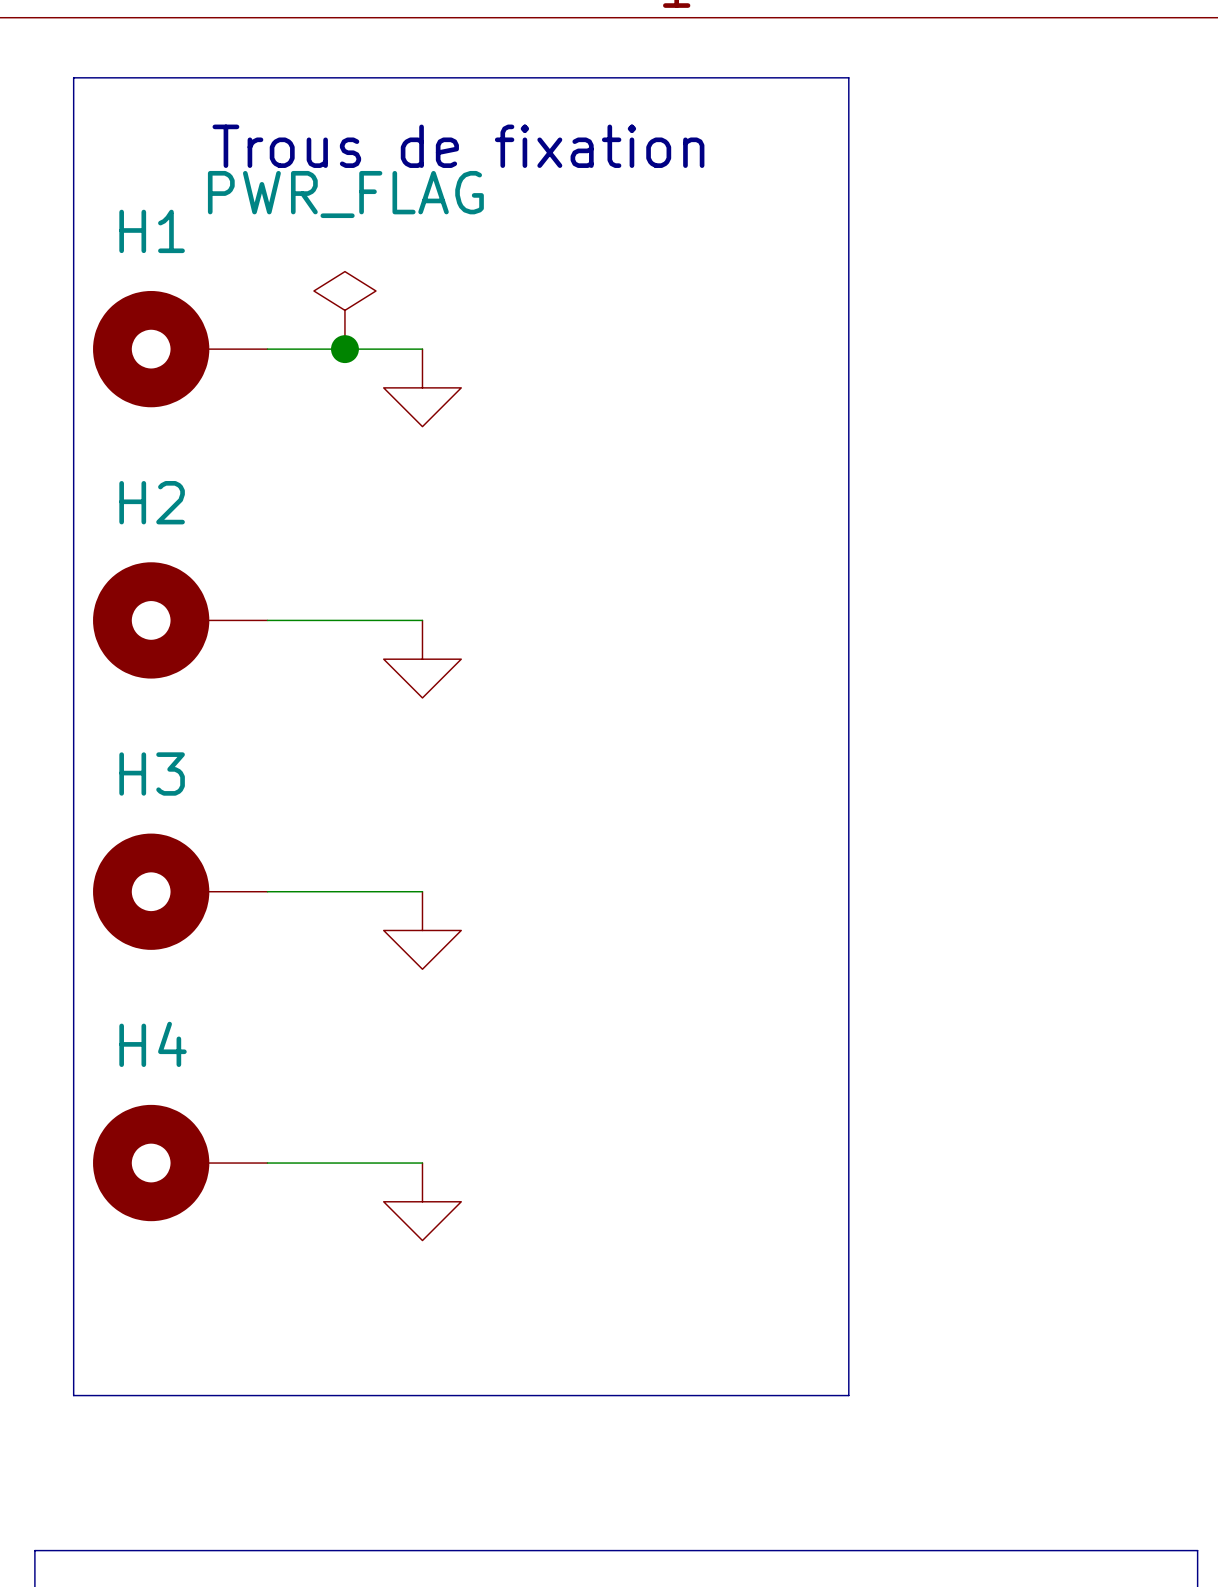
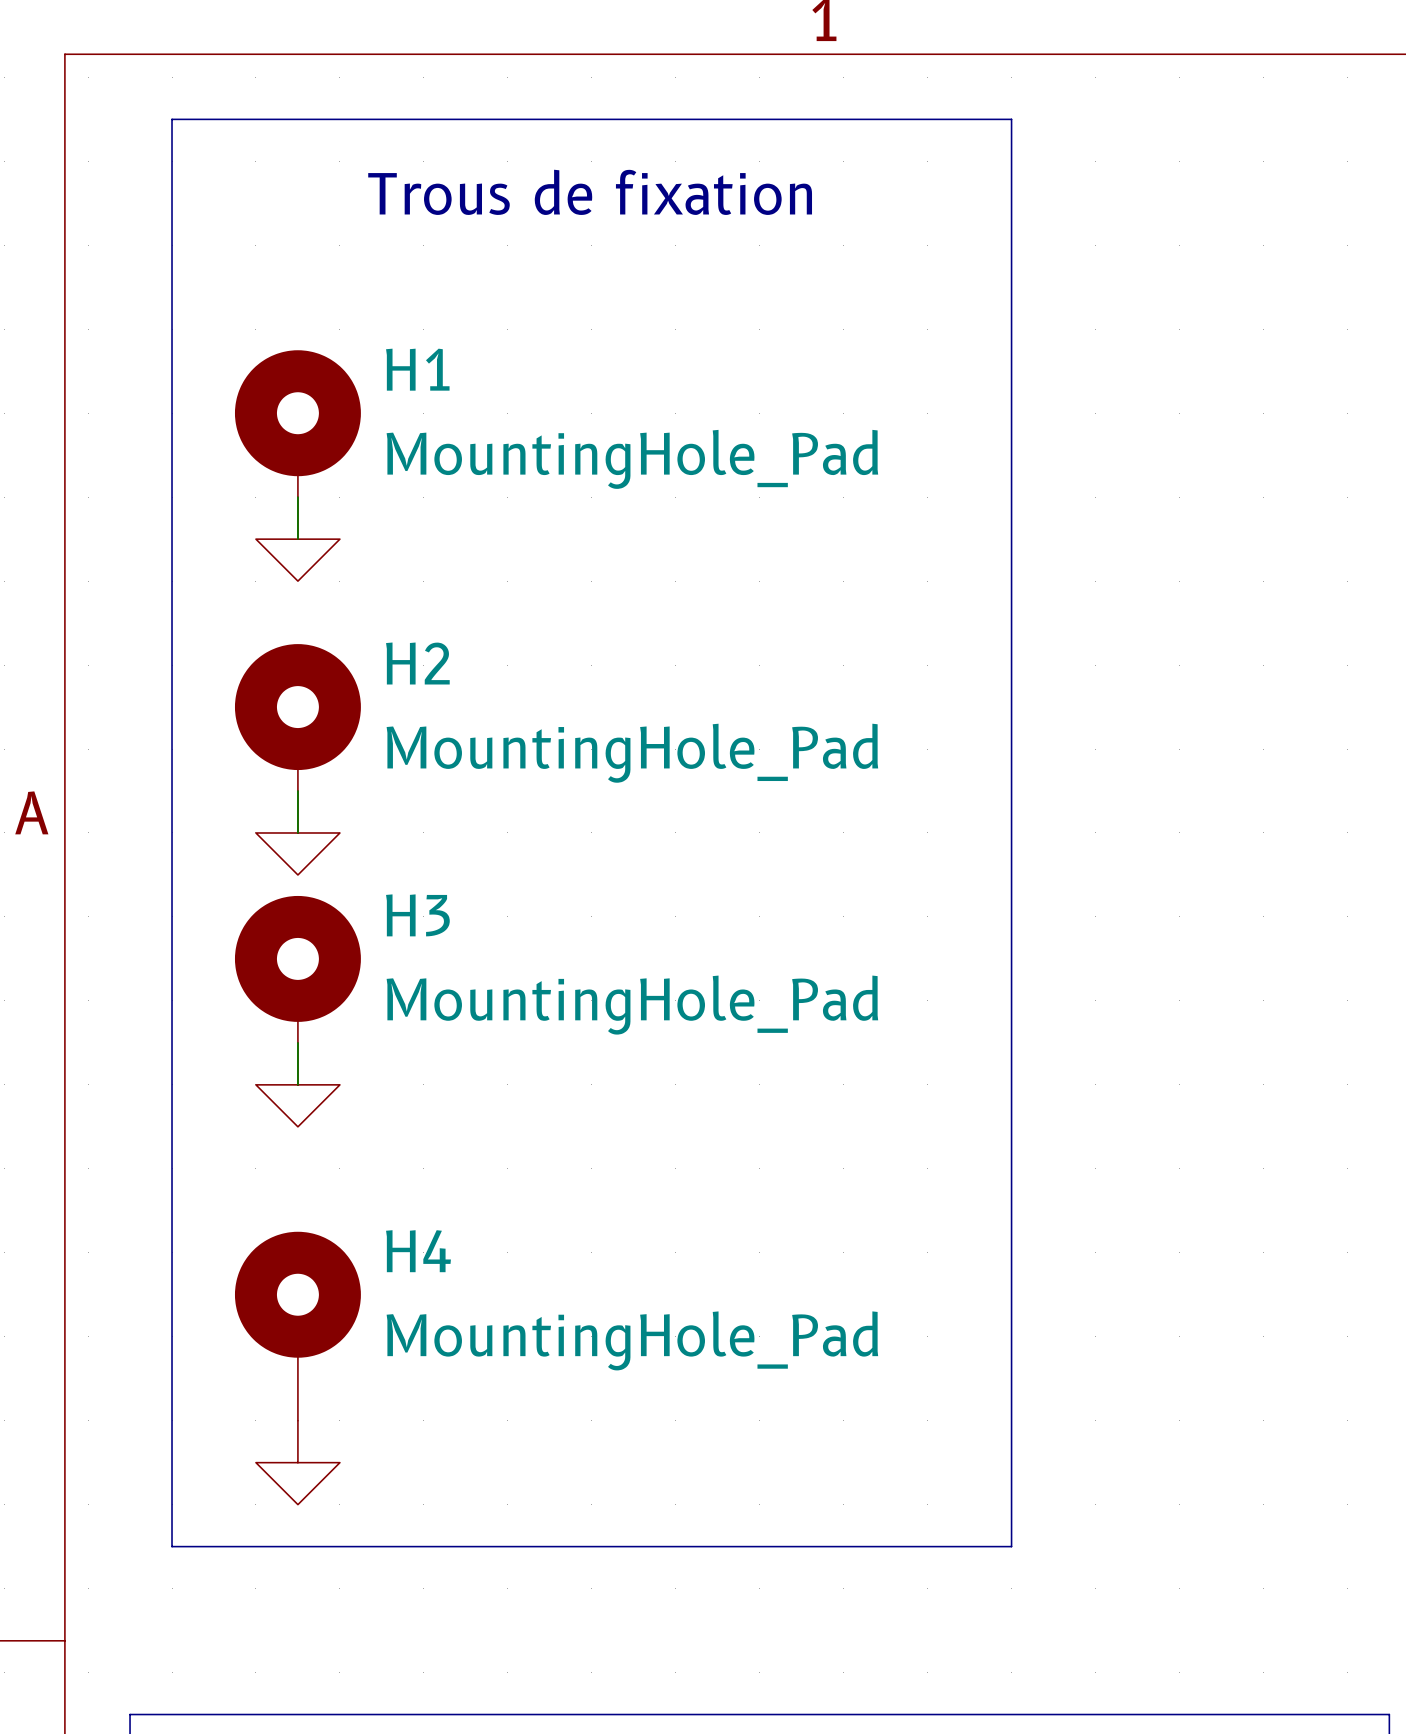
power symbol: PWR_FLAG (344, 310) -> none
H1 rotation: 0° (151, 349) -> 90° clockwise (297, 413)
wire: (267, 349) (422, 349) -> none
junction: (344, 349) -> none
power symbol: (422, 387) -> none
H1 value: none -> MountingHole_Pad (632, 459)
wire: none -> (297, 497) (297, 539)
power symbol: none -> (297, 539)
H2 rotation: 0° (151, 620) -> 90° clockwise (297, 707)
wire: (267, 620) (422, 620) -> none
power symbol: (422, 659) -> none
H2 value: none -> MountingHole_Pad (632, 753)
wire: none -> (297, 791) (297, 832)
power symbol: none -> (297, 832)
H3 rotation: 0° (151, 891) -> 90° clockwise (297, 958)
wire: (267, 891) (422, 891) -> none
H3 value: none -> MountingHole_Pad (632, 1005)
wire: none -> (297, 1042) (297, 1084)
power symbol: (422, 930) -> none
power symbol: none -> (297, 1084)
H4 rotation: 0° (151, 1163) -> 90° clockwise (297, 1294)
wire: (267, 1163) (422, 1163) -> none
power symbol: (422, 1201) -> none
H4 value: none -> MountingHole_Pad (632, 1340)
power symbol: none -> (297, 1462)

